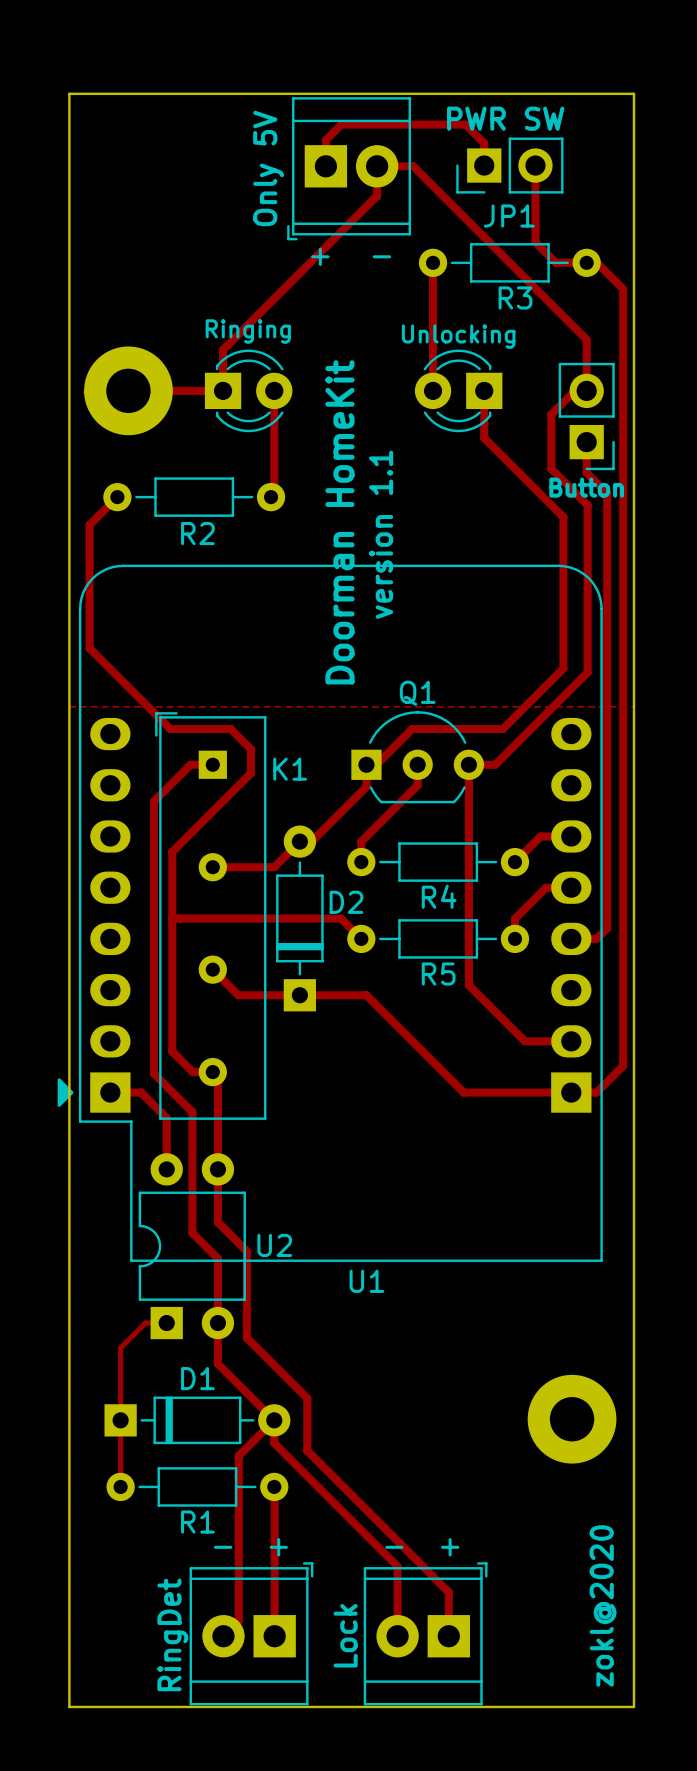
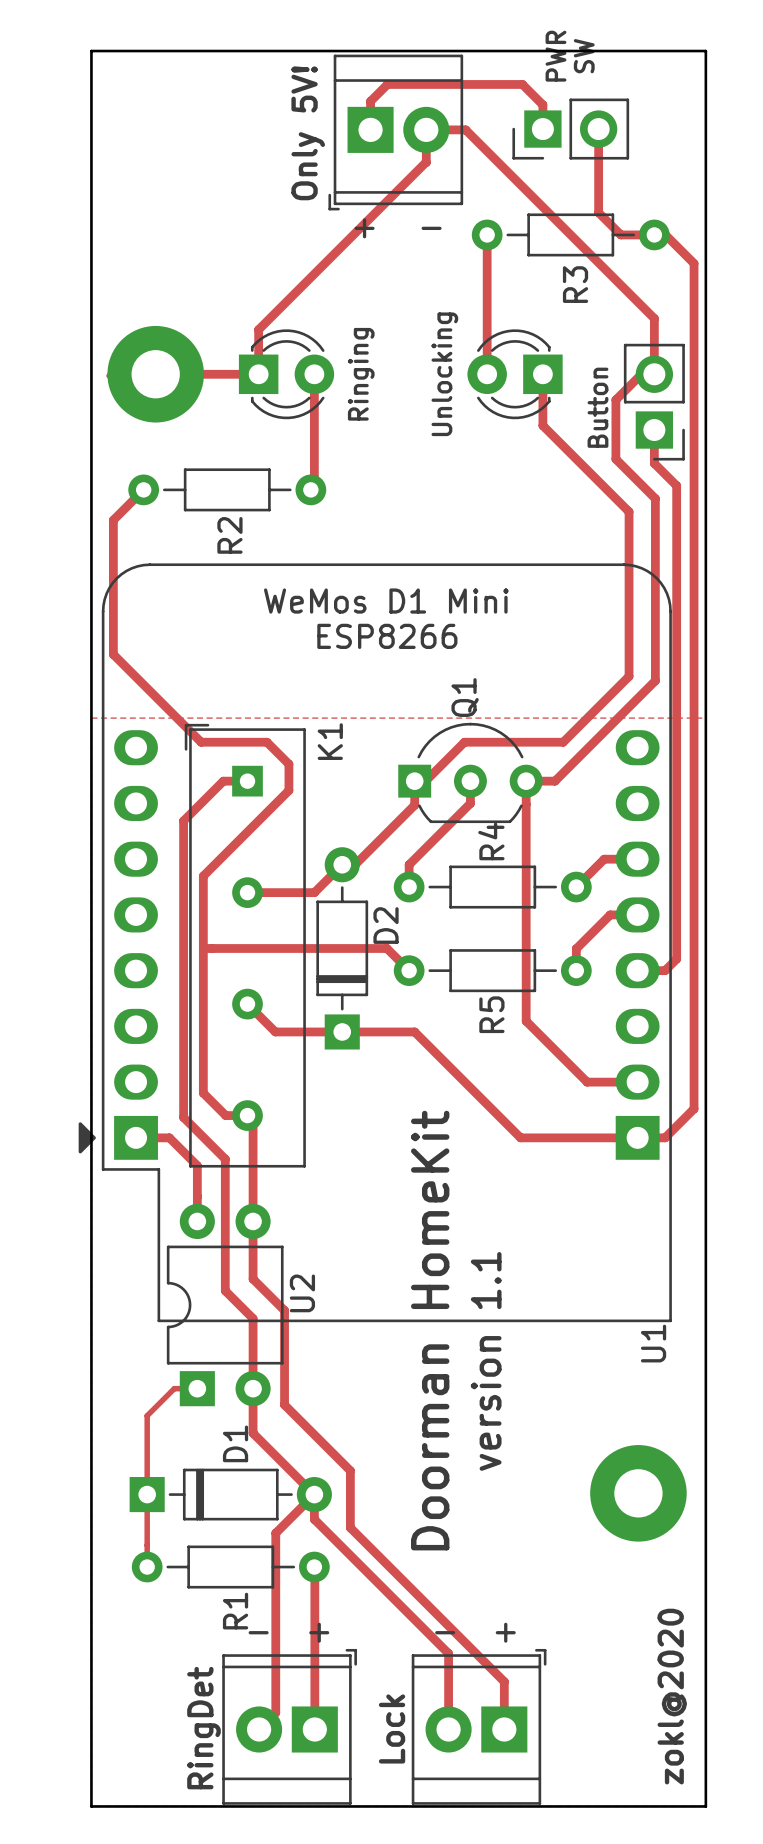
text: none -> SW (584, 56)
text: PWR SW (505, 118) -> PWR (555, 56)
text: Only 5V (268, 168) -> Only 5V! (308, 133)
JP1 name: JP1 (509, 216) -> none
R3 name rotation: 0° (515, 297) -> 90° counterclockwise (575, 284)
Ringing name rotation: 0° (248, 331) -> 90° counterclockwise (361, 374)
Unlocking name rotation: 0° (458, 336) -> 90° counterclockwise (444, 374)
Button name rotation: 0° (586, 487) -> 90° counterclockwise (597, 407)
text: Doorman HomeKit (339, 522) -> none
R2 name rotation: 0° (197, 533) -> 90° counterclockwise (229, 535)
text: version 1.1 (381, 534) -> none
text: none -> WeMos D1 Mini (386, 601)
text: none -> ESP8266 (387, 636)
Q1 name rotation: 0° (417, 693) -> 90° counterclockwise (465, 697)
K1 name rotation: 0° (290, 769) -> 90° counterclockwise (330, 741)
R4 name rotation: 0° (439, 896) -> 90° counterclockwise (491, 841)
R4 name position: R4 (439, 896) -> R4 (491, 841)
D2 name rotation: 0° (346, 902) -> 90° counterclockwise (386, 925)
R5 name rotation: 0° (438, 974) -> 90° counterclockwise (491, 1014)
U2 name rotation: 0° (274, 1245) -> 90° counterclockwise (302, 1293)
text: none -> Doorman HomeKit (430, 1330)
U1 name rotation: 0° (366, 1281) -> 90° counterclockwise (653, 1343)
U1 name position: U1 (366, 1281) -> U1 (653, 1343)
text: none -> version 1.1 (486, 1361)
D1 name rotation: 0° (197, 1378) -> 90° counterclockwise (235, 1443)
R1 name rotation: 0° (197, 1522) -> 90° counterclockwise (235, 1611)

